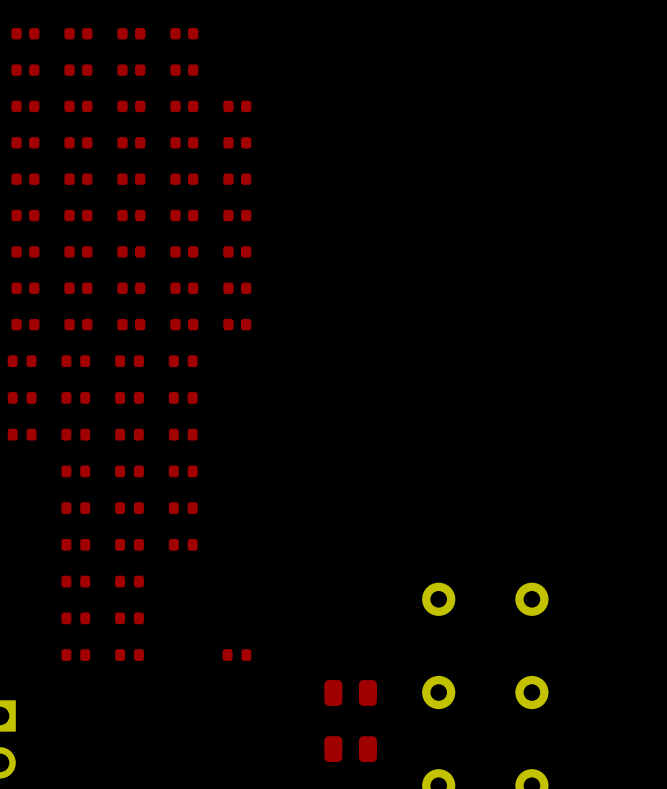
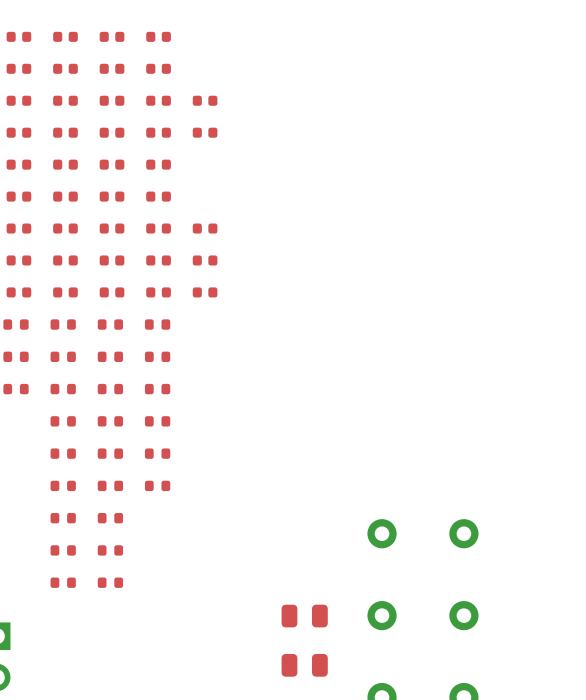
part: (237, 179) -> none
part: (237, 215) -> none
part: (236, 655) -> none

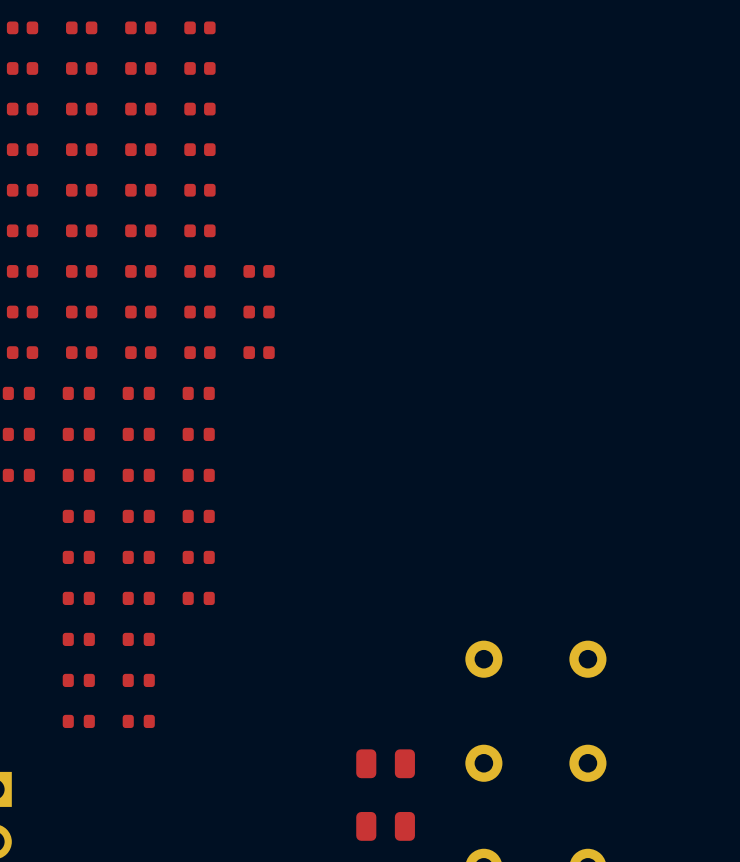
part: (205, 100) -> none
part: (205, 132) -> none

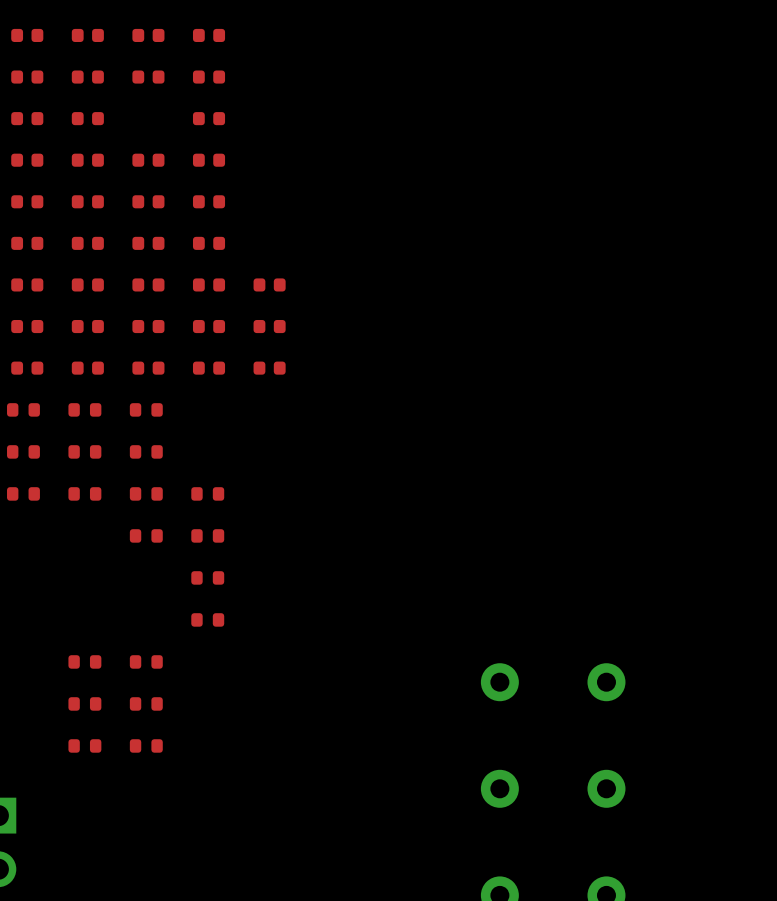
part: (140, 109) -> none
part: (198, 393) -> none
part: (198, 434) -> none
part: (78, 516) -> none
part: (78, 557) -> none
part: (138, 557) -> none
part: (78, 598) -> none
part: (138, 598) -> none
part: (385, 763) -> none
part: (385, 826) -> none

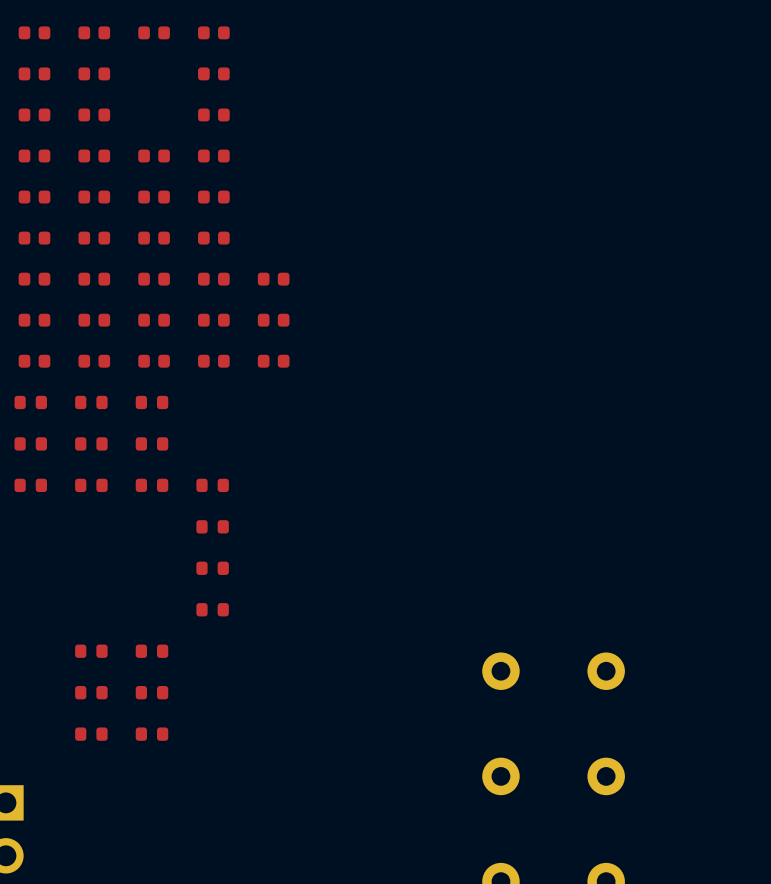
part: (148, 77) -> none
part: (146, 535) -> none

